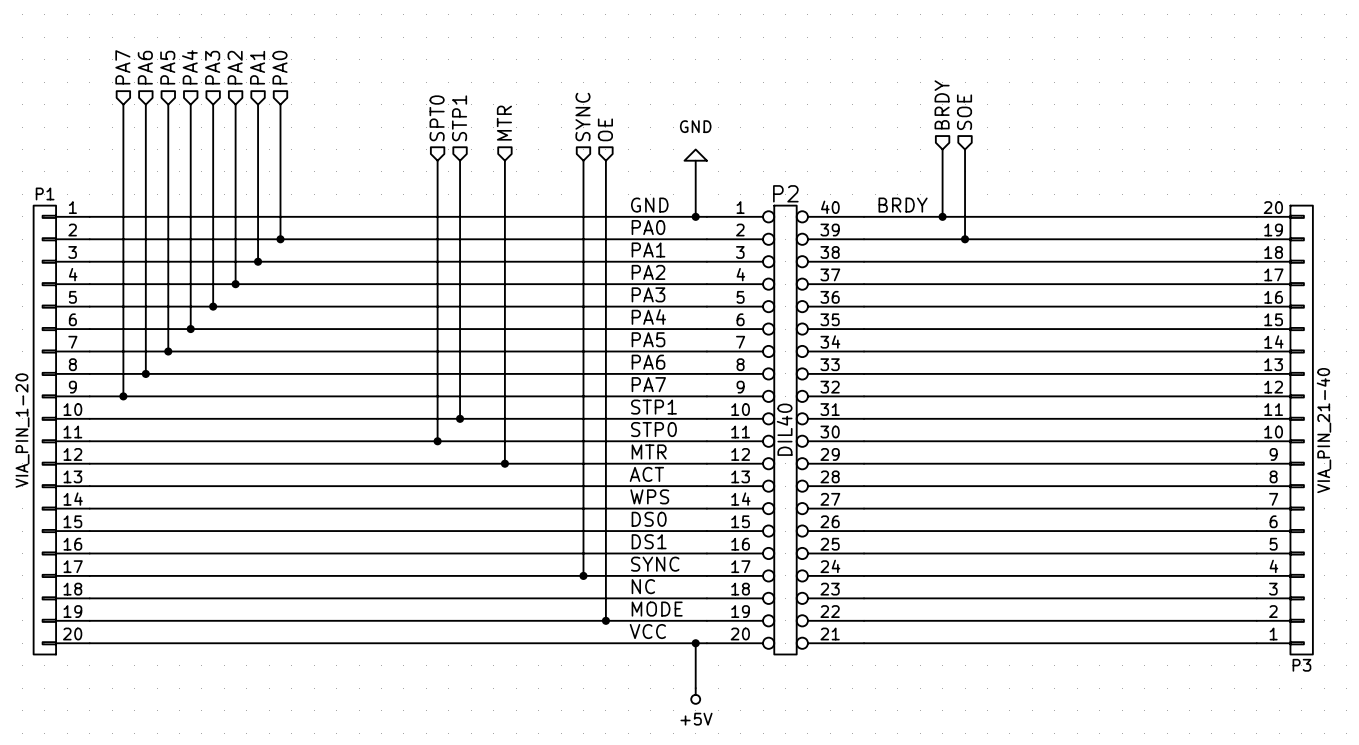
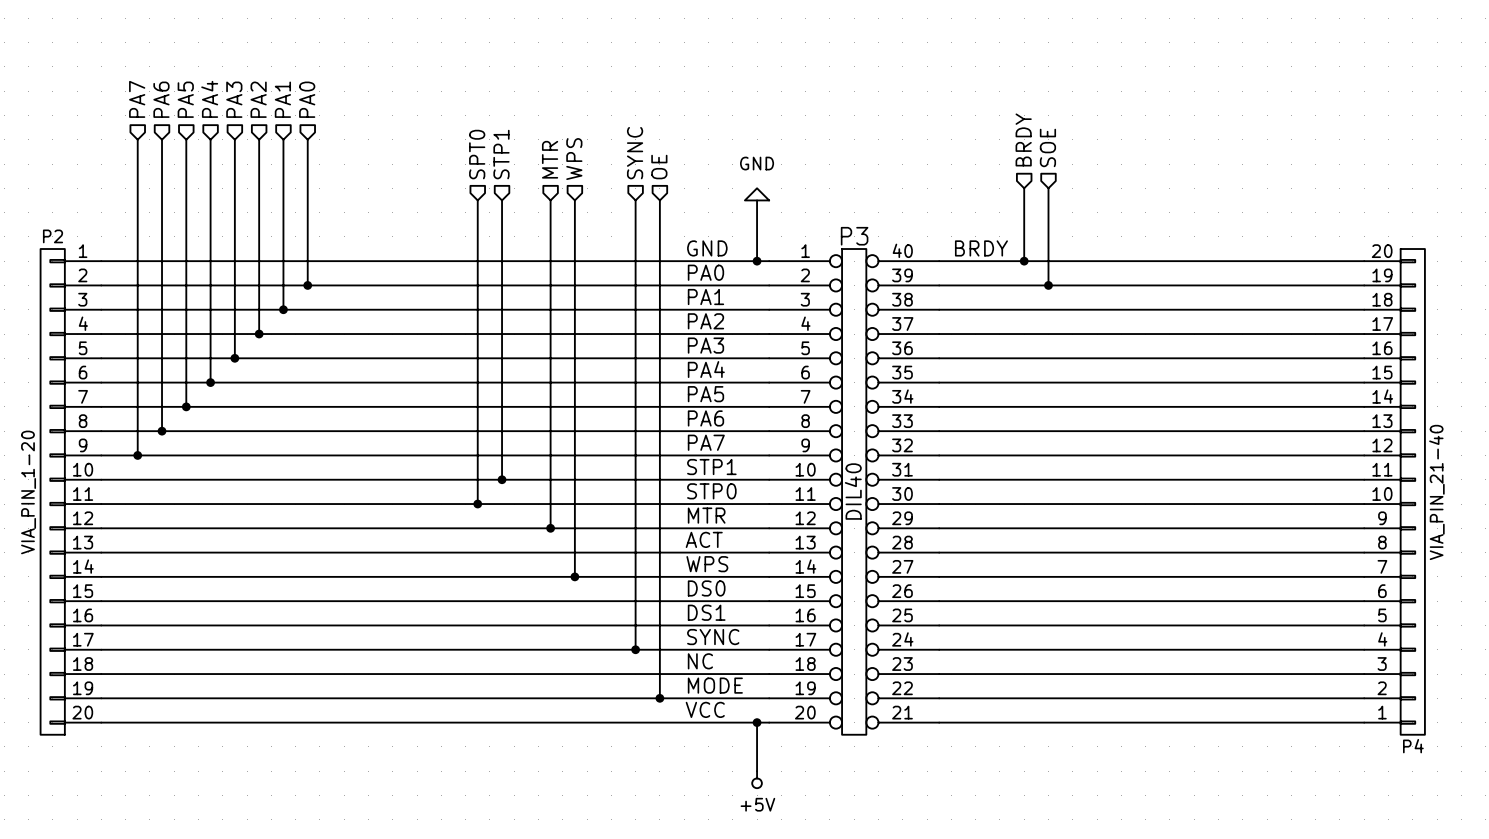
hierarchical label: none -> WPS (574, 159)
wire: none -> (574, 200) (574, 576)
P1 name: P1 (45, 193) -> P2 (53, 236)
P2 name: P2 (785, 193) -> P3 (854, 236)
junction: none -> (574, 576)
P3 name: P3 (1301, 665) -> P4 (1413, 746)

